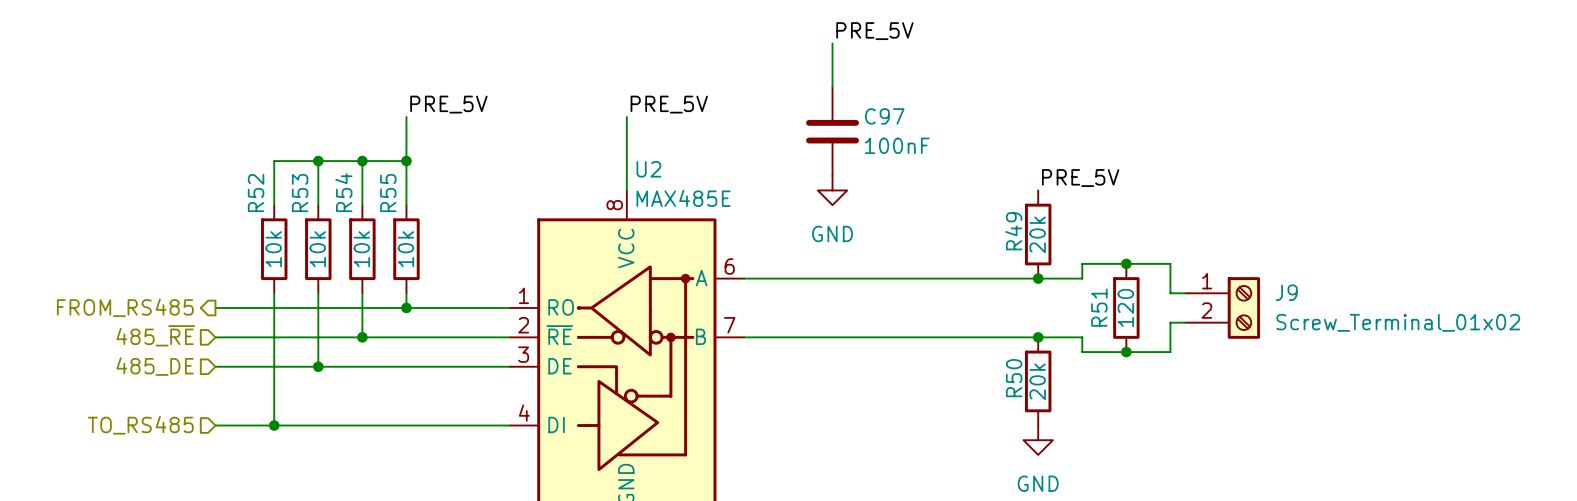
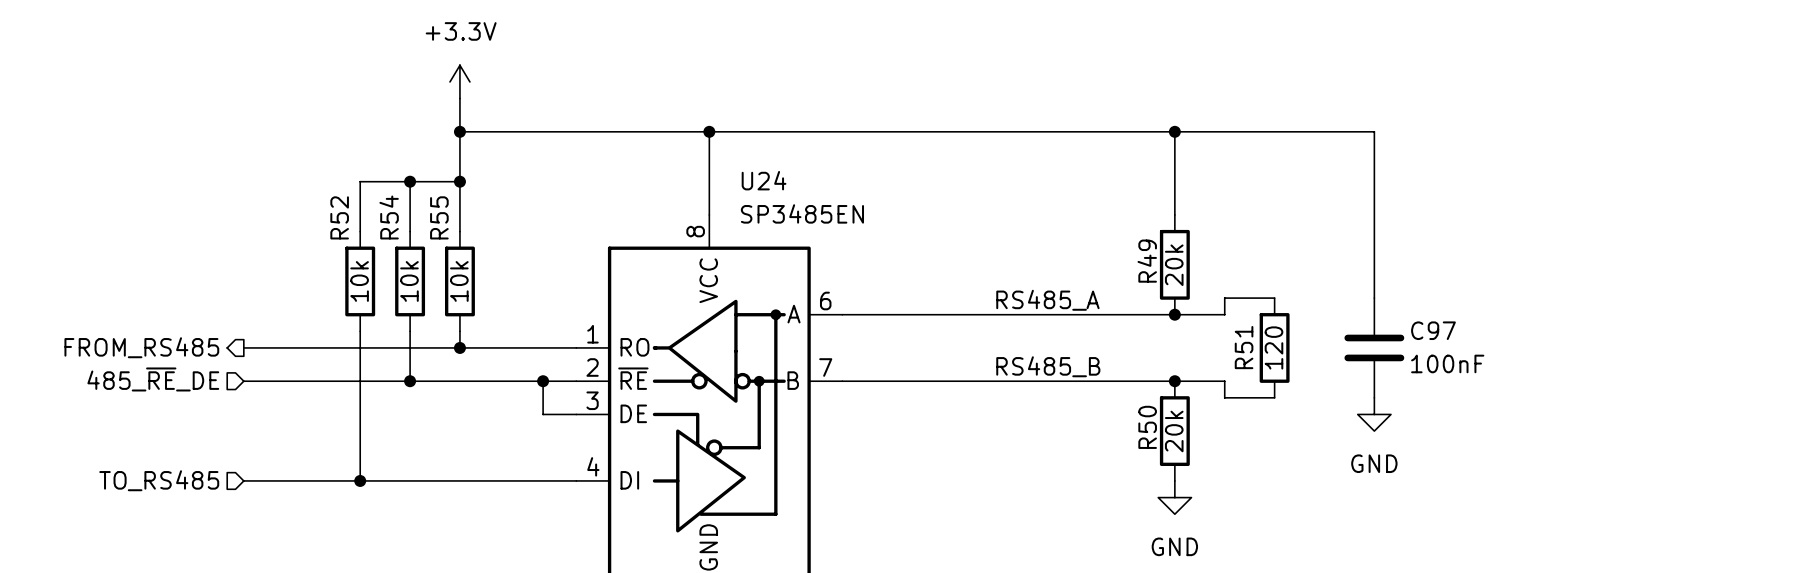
label: PRE_5V (874, 31) -> none
wire: (832, 43) (832, 87) -> none
power symbol: none -> +3.3V (459, 81)
wire: none -> (459, 98) (459, 131) (1374, 131) (1374, 298)
label: PRE_5V (448, 104) -> none
label: PRE_5V (669, 104) -> none
junction: none -> (459, 131)
junction: none -> (709, 131)
wire: none -> (1174, 131) (1174, 214)
junction: none -> (1174, 131)
C97 position: (832, 131) -> (1374, 347)
wire: (318, 161) (274, 161) (274, 205) -> none
junction: (318, 161) -> none
U2 name: U2 (648, 169) -> U24 (764, 180)
label: PRE_5V (1080, 178) -> none
power symbol: GND (832, 190) -> none
R53 name: R53 (300, 193) -> R52 (339, 217)
U2 value: MAX485E (683, 198) -> SP3485EN (802, 213)
R52: 10k (274, 249) -> none
wire: (1126, 263) (1170, 263) (1170, 293) (1185, 293) -> none
junction: (1126, 263) -> none
label: none -> RS485_A (1047, 300)
wire: (274, 293) (274, 425) -> none
J9: Screw_Terminal_01x02 (1222, 307) -> none
wire: (1185, 322) (1170, 322) (1170, 352) (1126, 352) -> none
label: none -> RS485_B (1048, 366)
hierarchical label: 485_~{RE} (155, 335) -> 485_~{RE}_DE (153, 379)
junction: none -> (543, 381)
junction: (1126, 352) -> none
hierarchical label: 485_DE (155, 366) -> none
wire: (215, 366) (479, 366) -> (543, 381) (543, 414)
wire: none -> (360, 414) (360, 480)
junction: (318, 366) -> none
power symbol: none -> GND (1374, 414)
junction: (274, 425) -> none
junction: none -> (360, 480)

